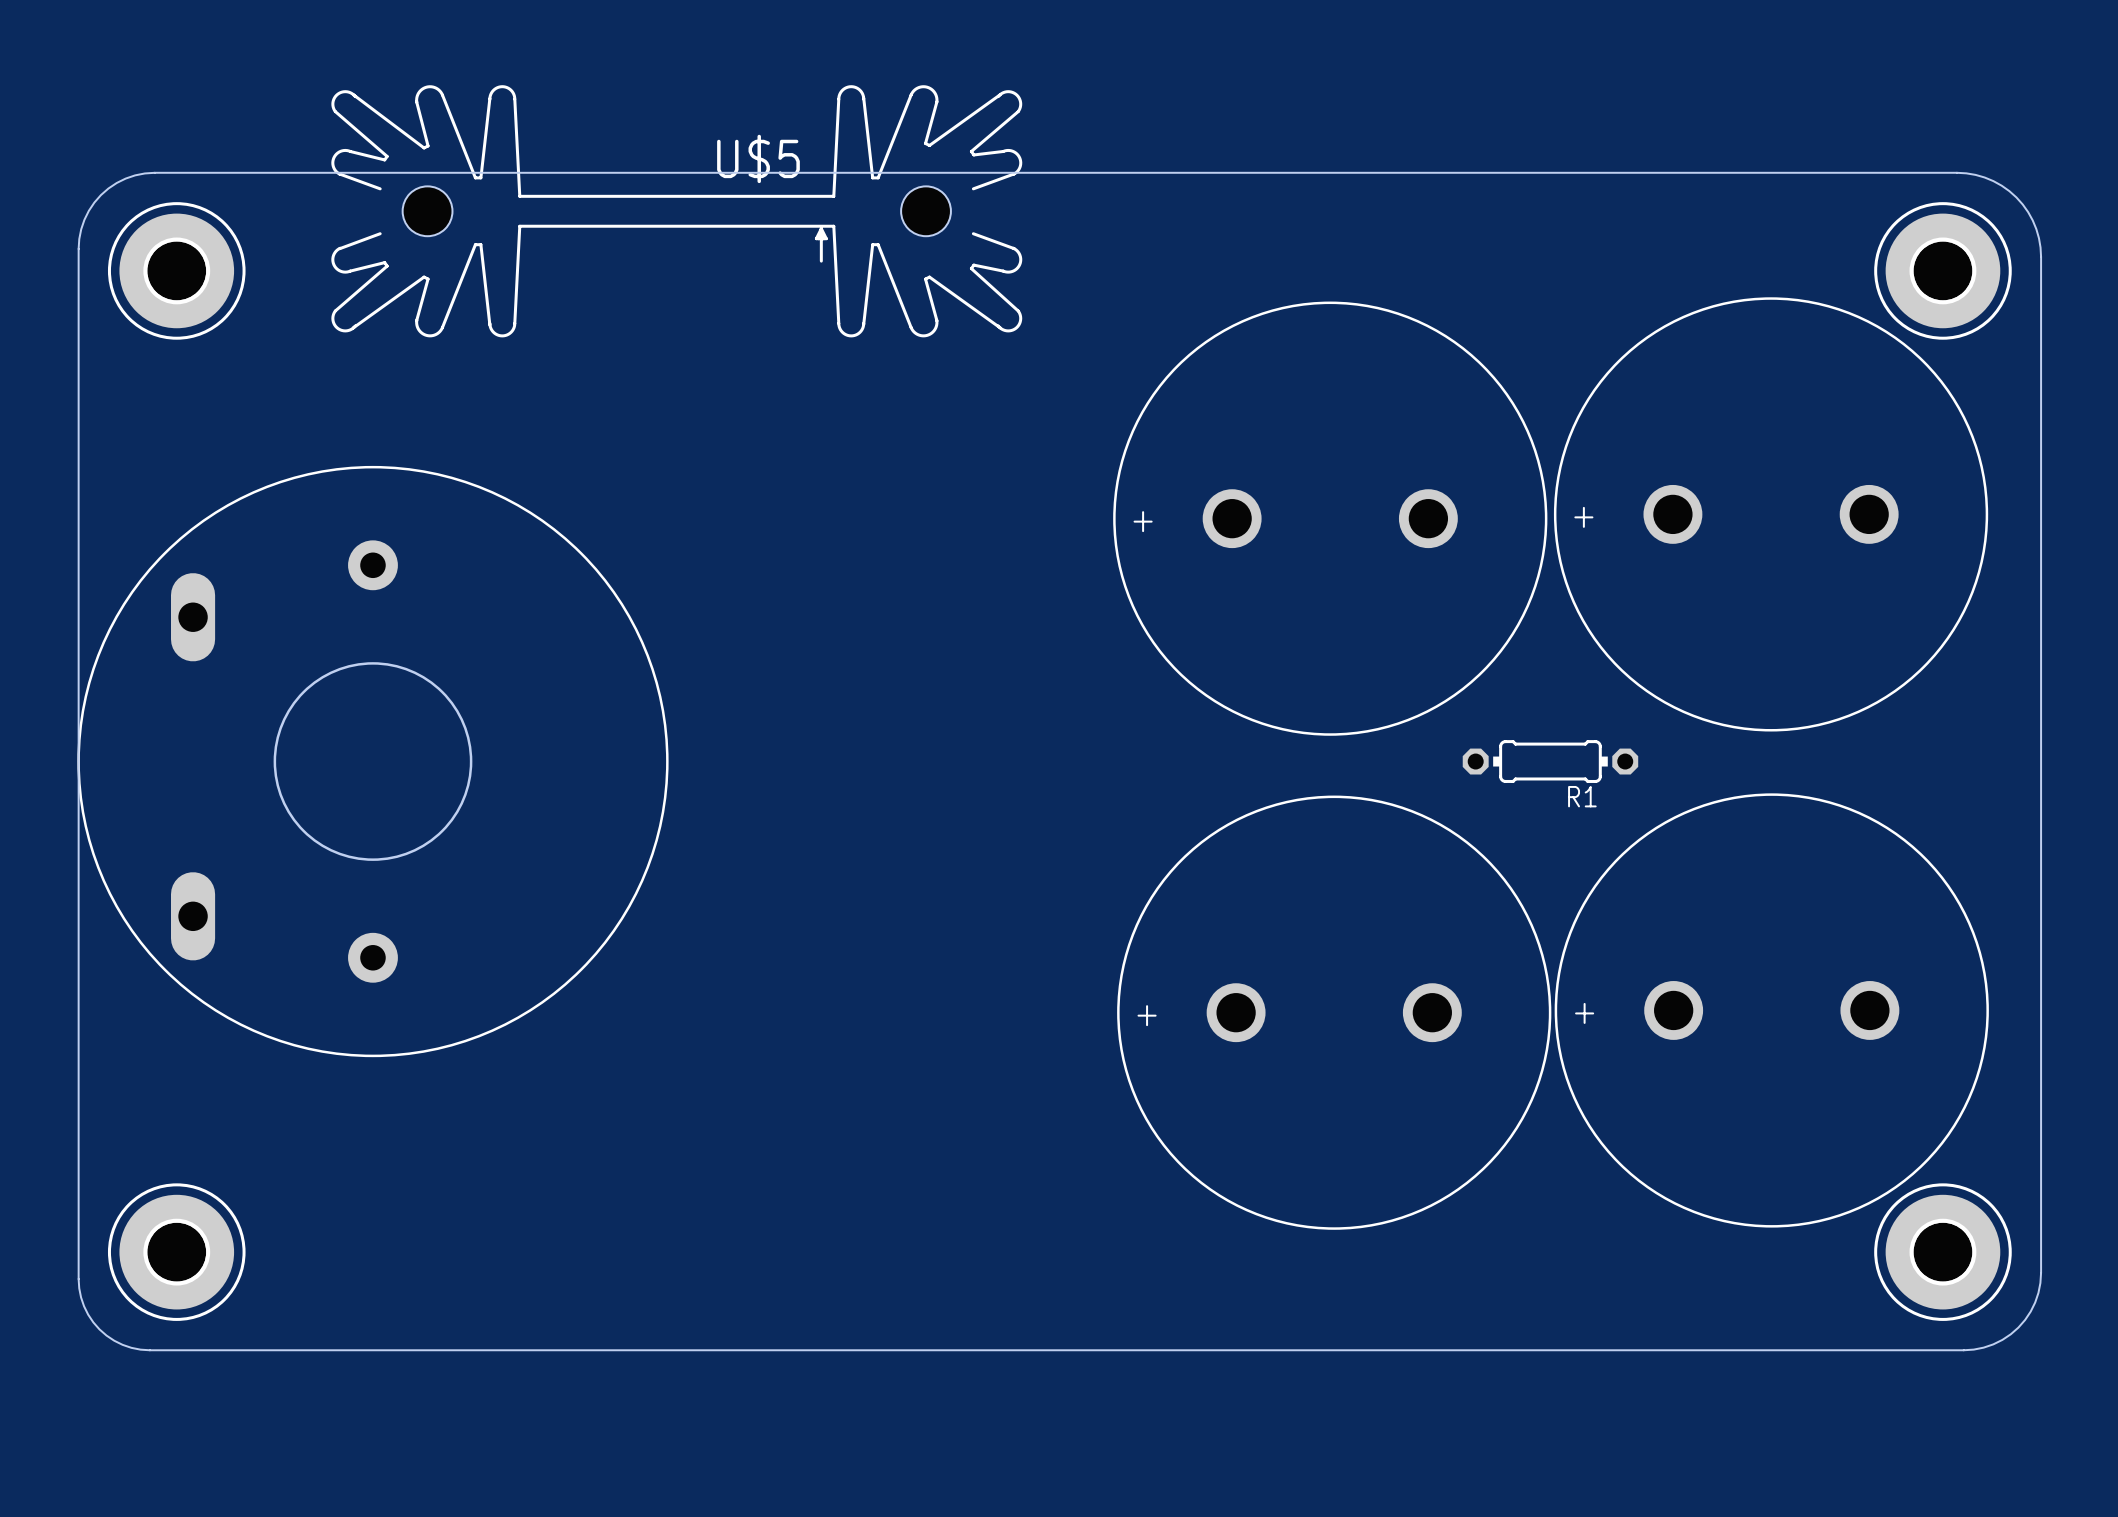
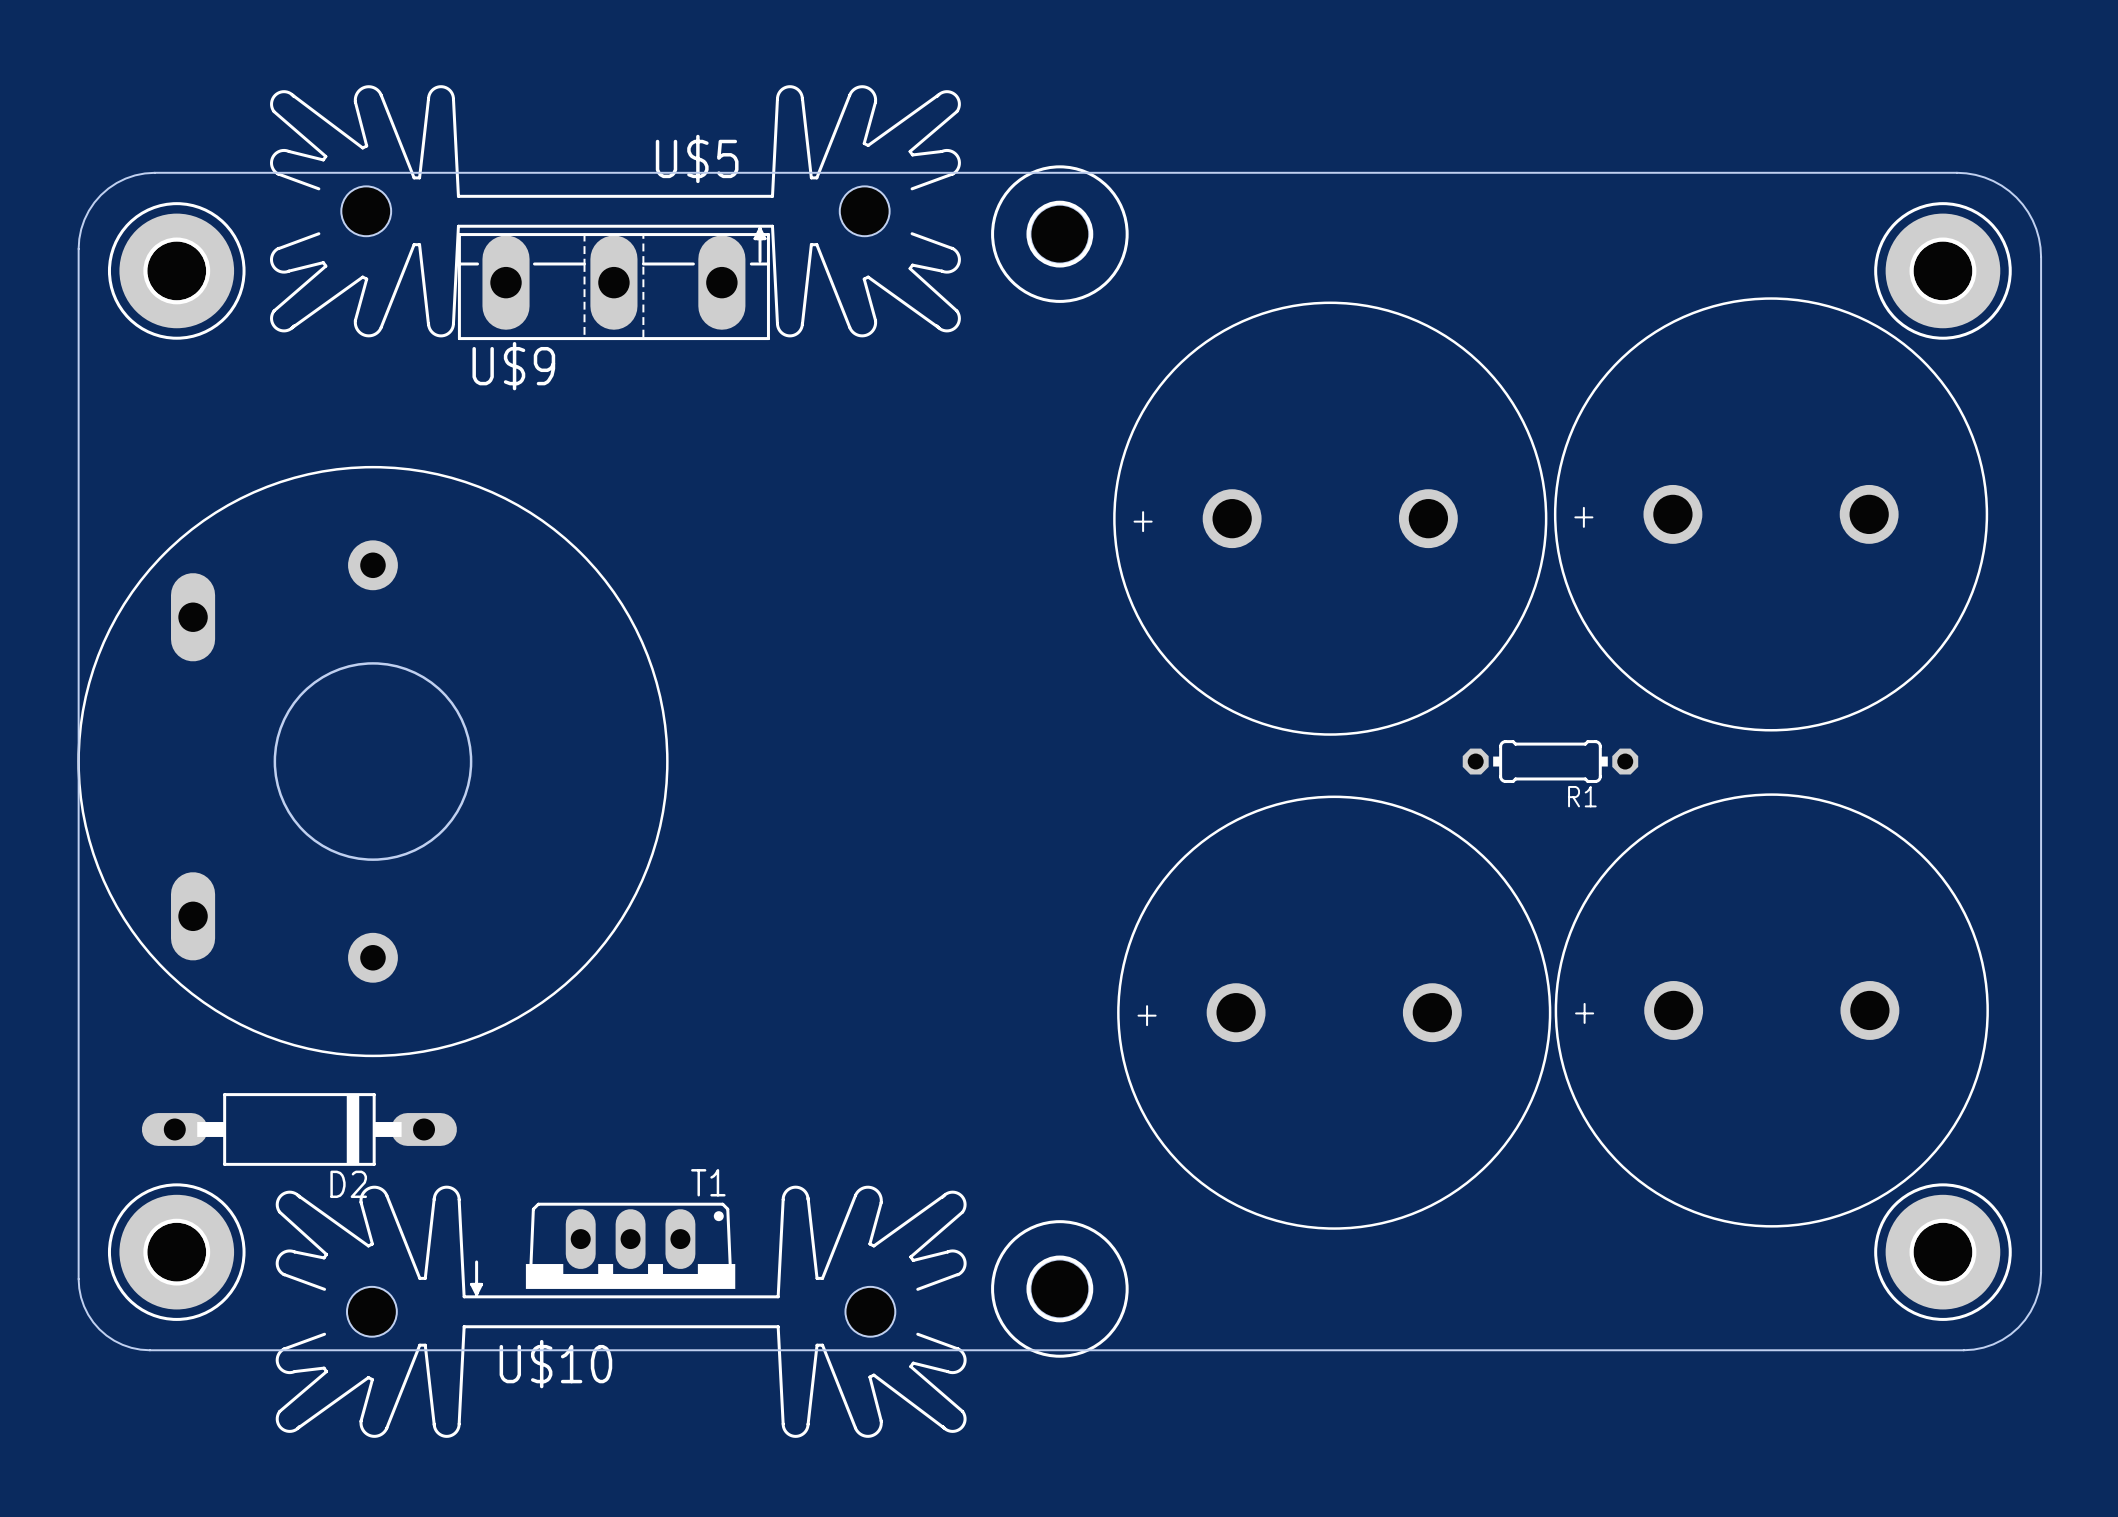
U$5 position: (676, 211) -> (615, 211)
part: none -> (1059, 234)
U$9: none -> (613, 286)
D2: none -> (299, 1129)
T1: none -> (630, 1245)
part: none -> (1059, 1288)
U$10: none -> (621, 1311)

